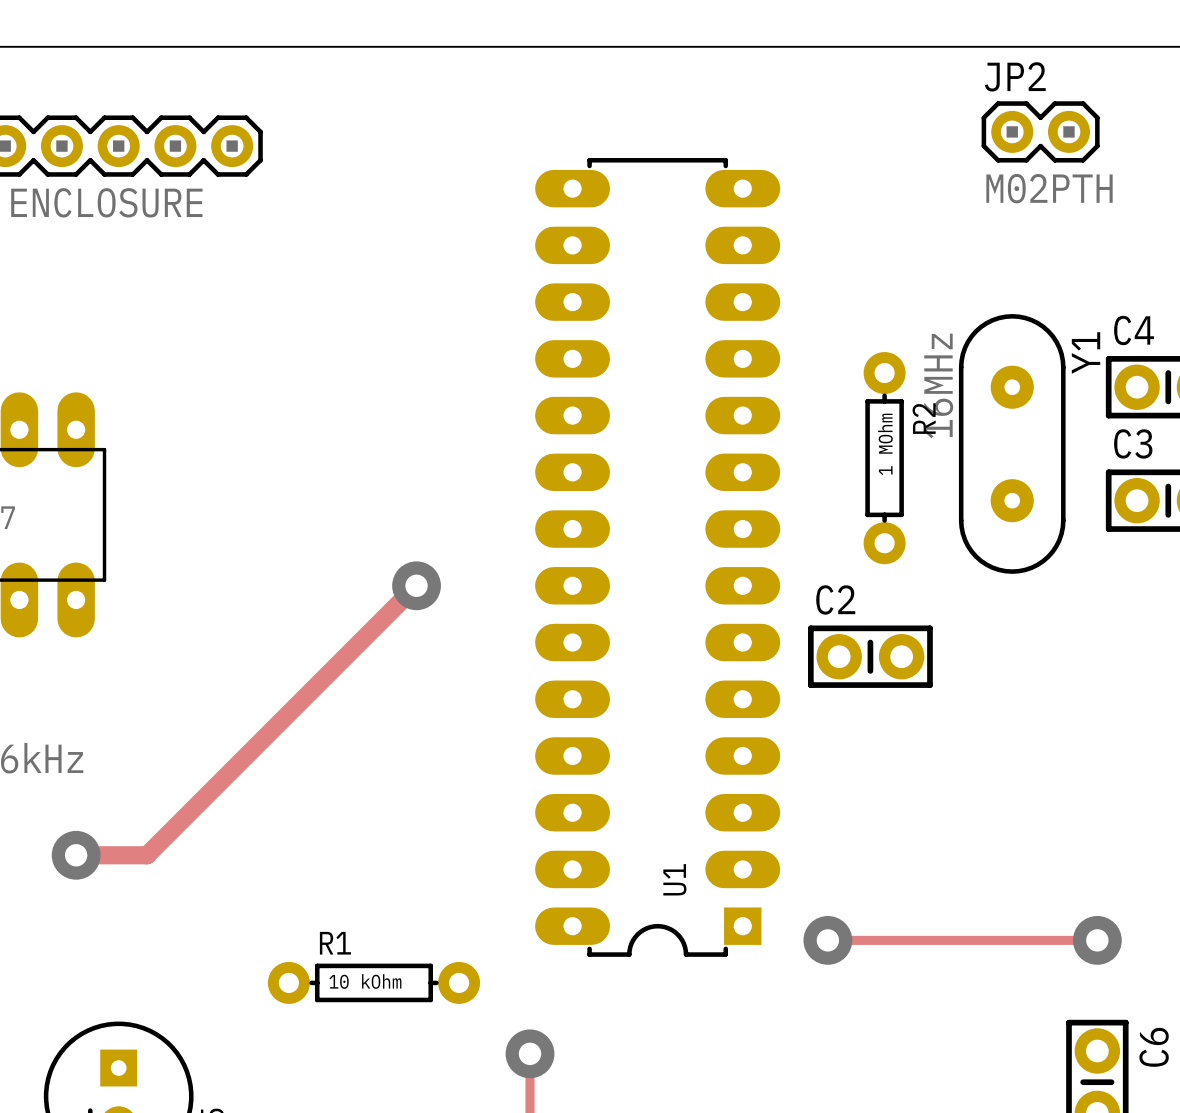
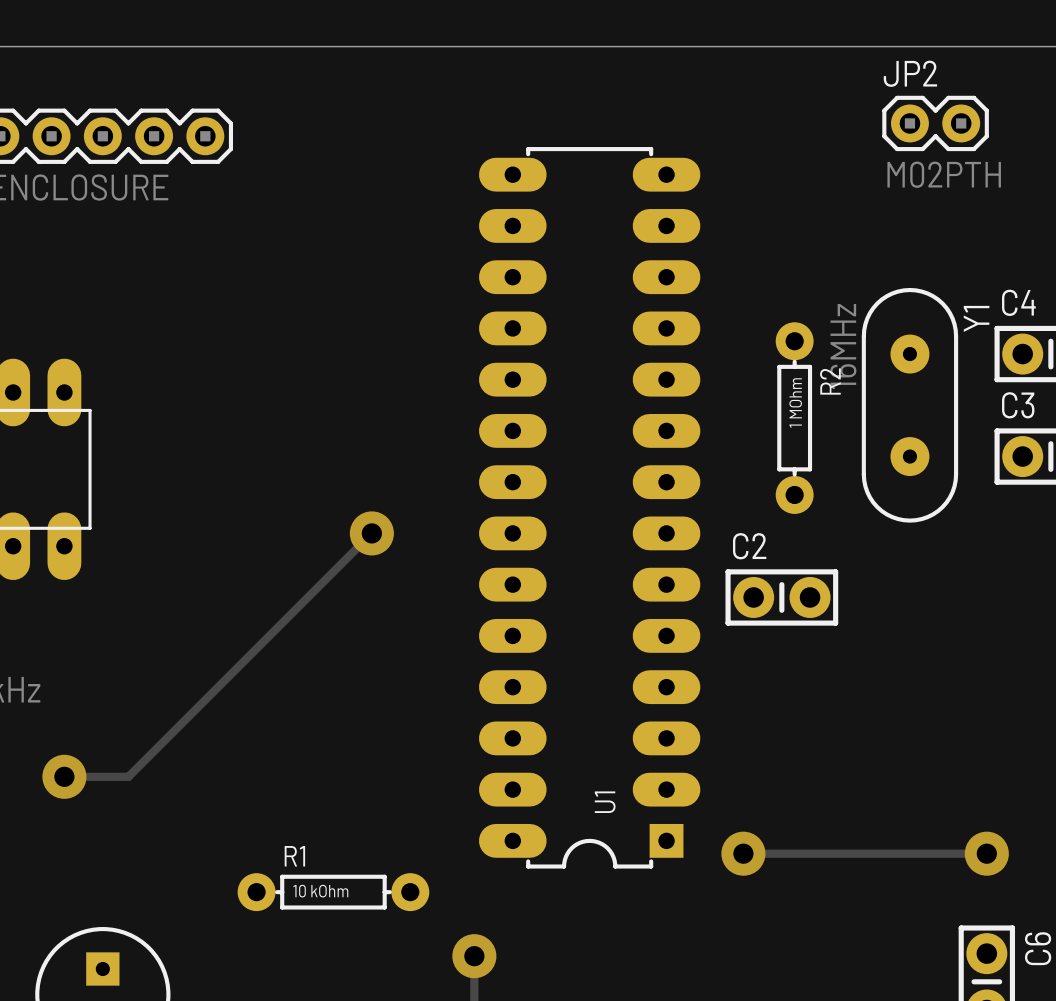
track width: thick (416, 585) (147, 855) (76, 855) -> thin (371, 533) (128, 776) (64, 776)

